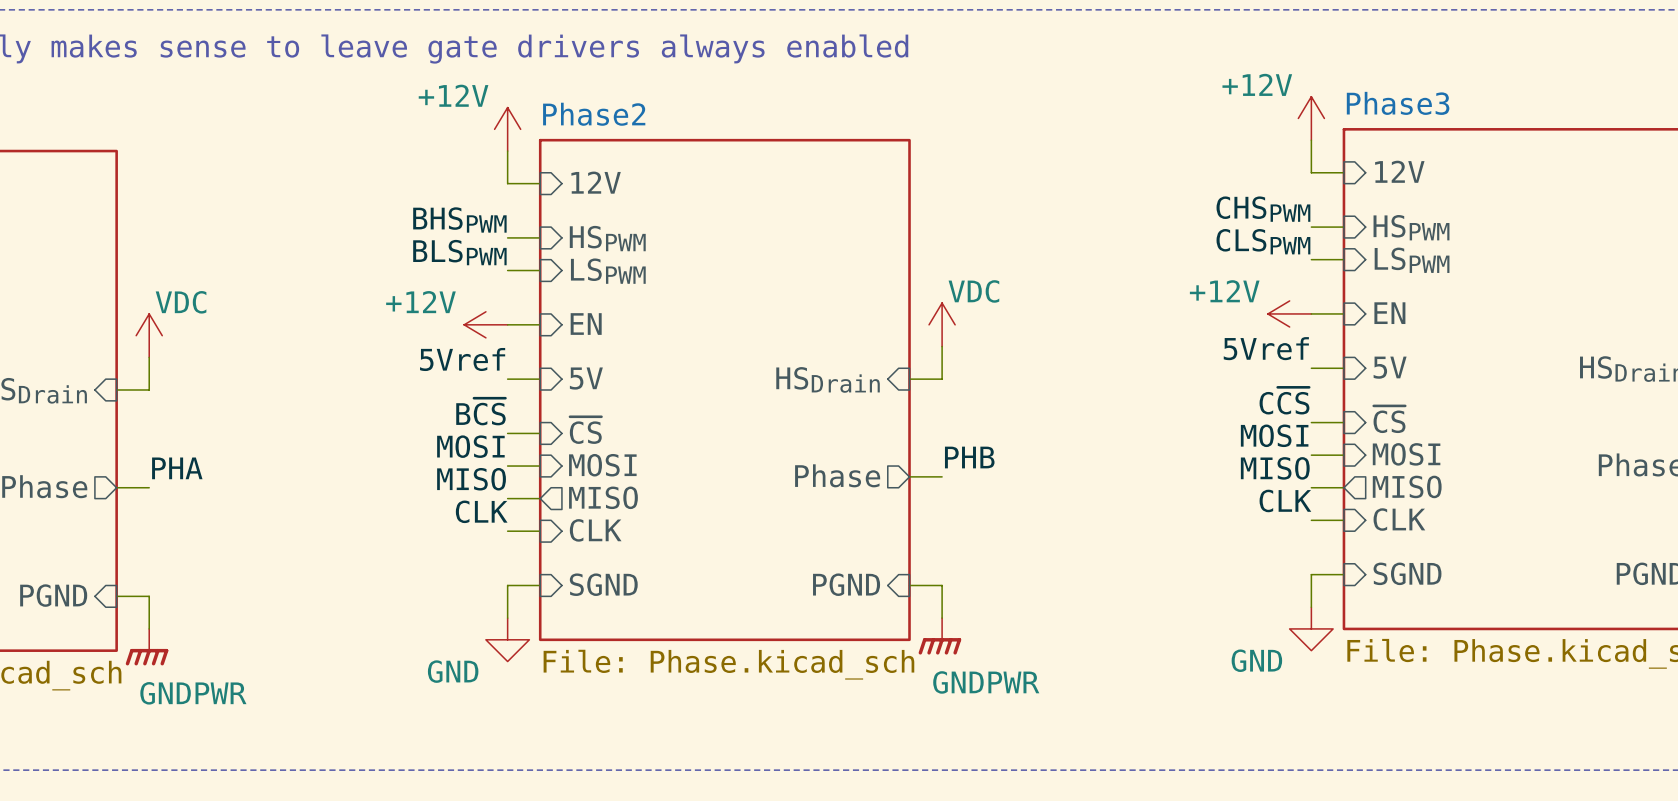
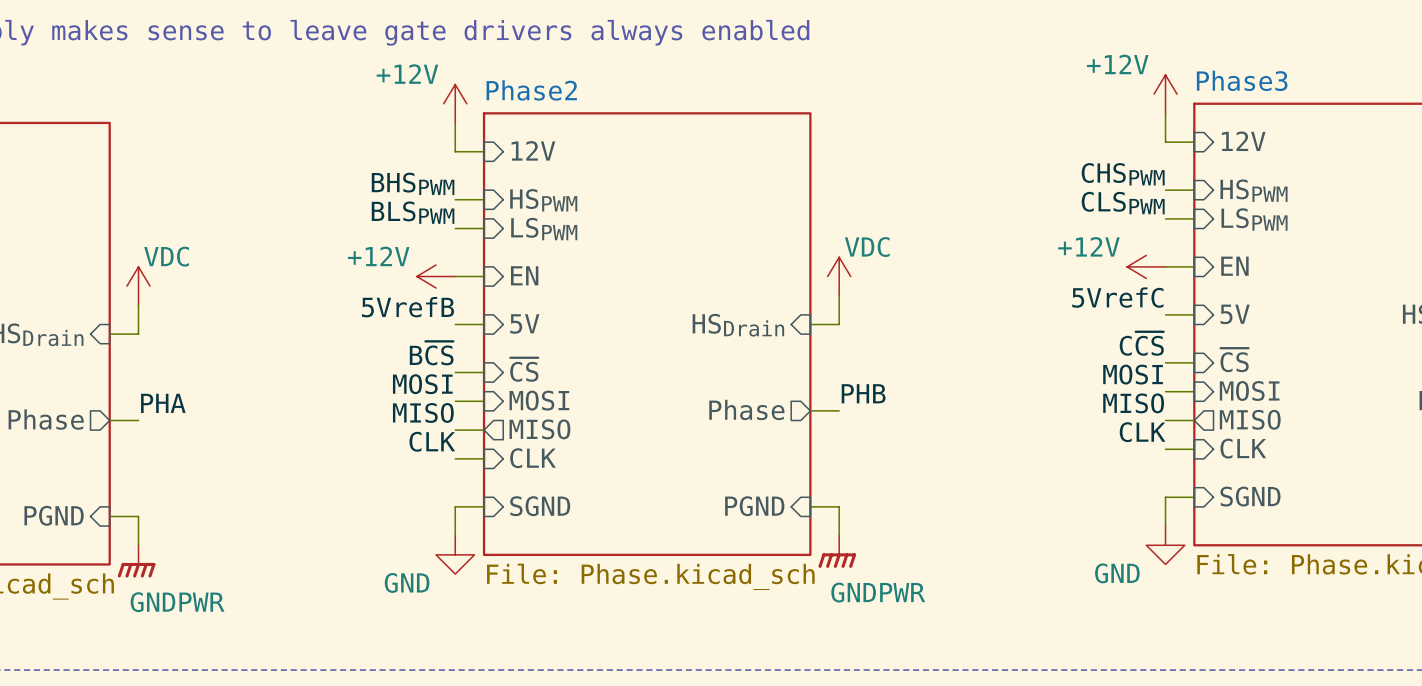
label: 5Vref (1266, 348) -> 5VrefC (1117, 297)
label: 5Vref (462, 359) -> 5VrefB (407, 307)

